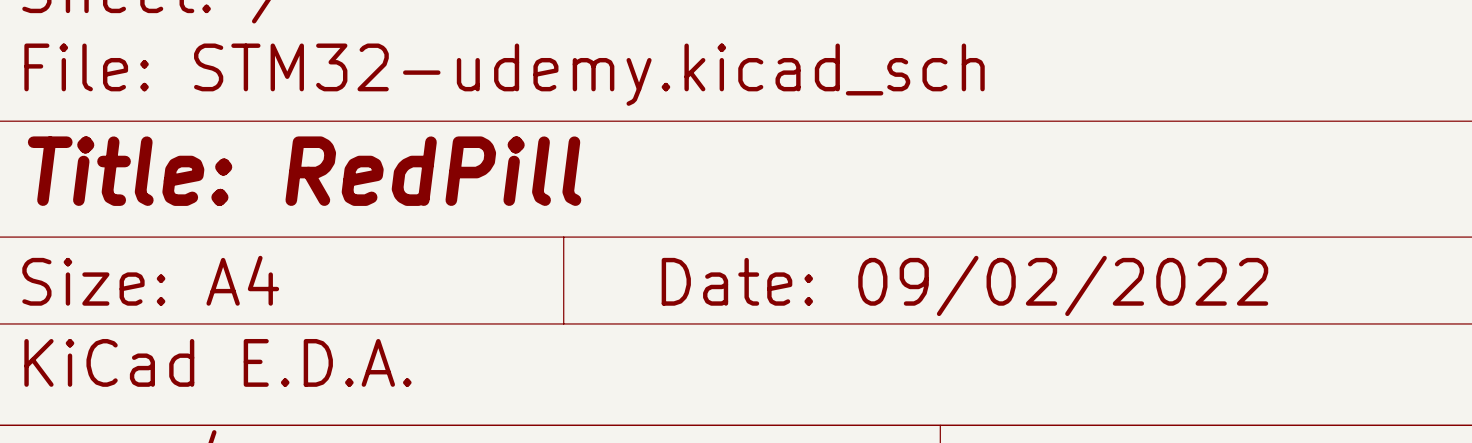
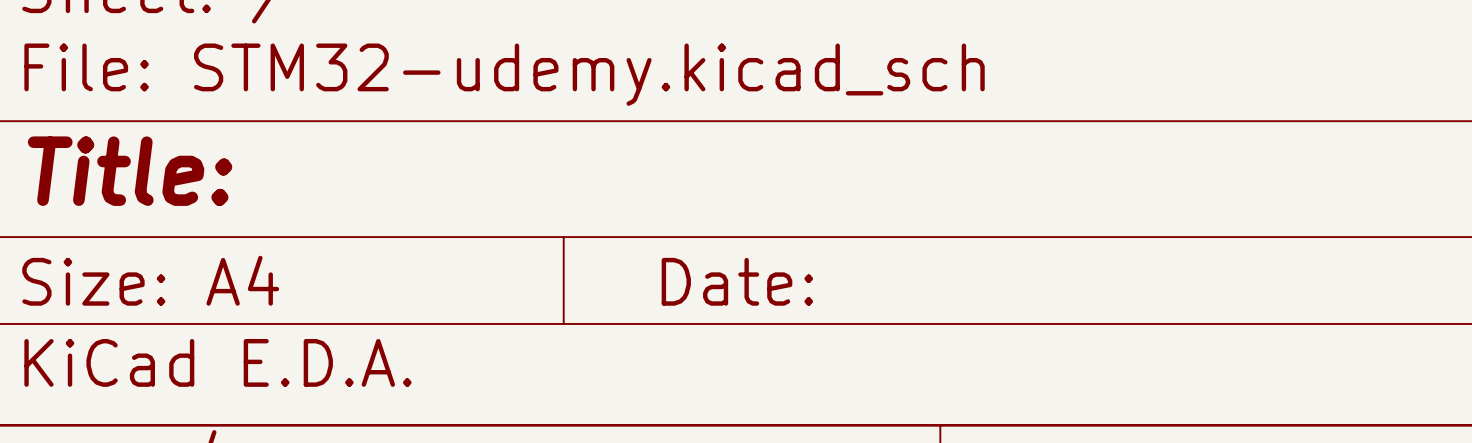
title block: Title: RedPill (304, 171) -> Title: (130, 171)
title block: Date: 09/02/2022 (964, 285) -> Date: (737, 281)

